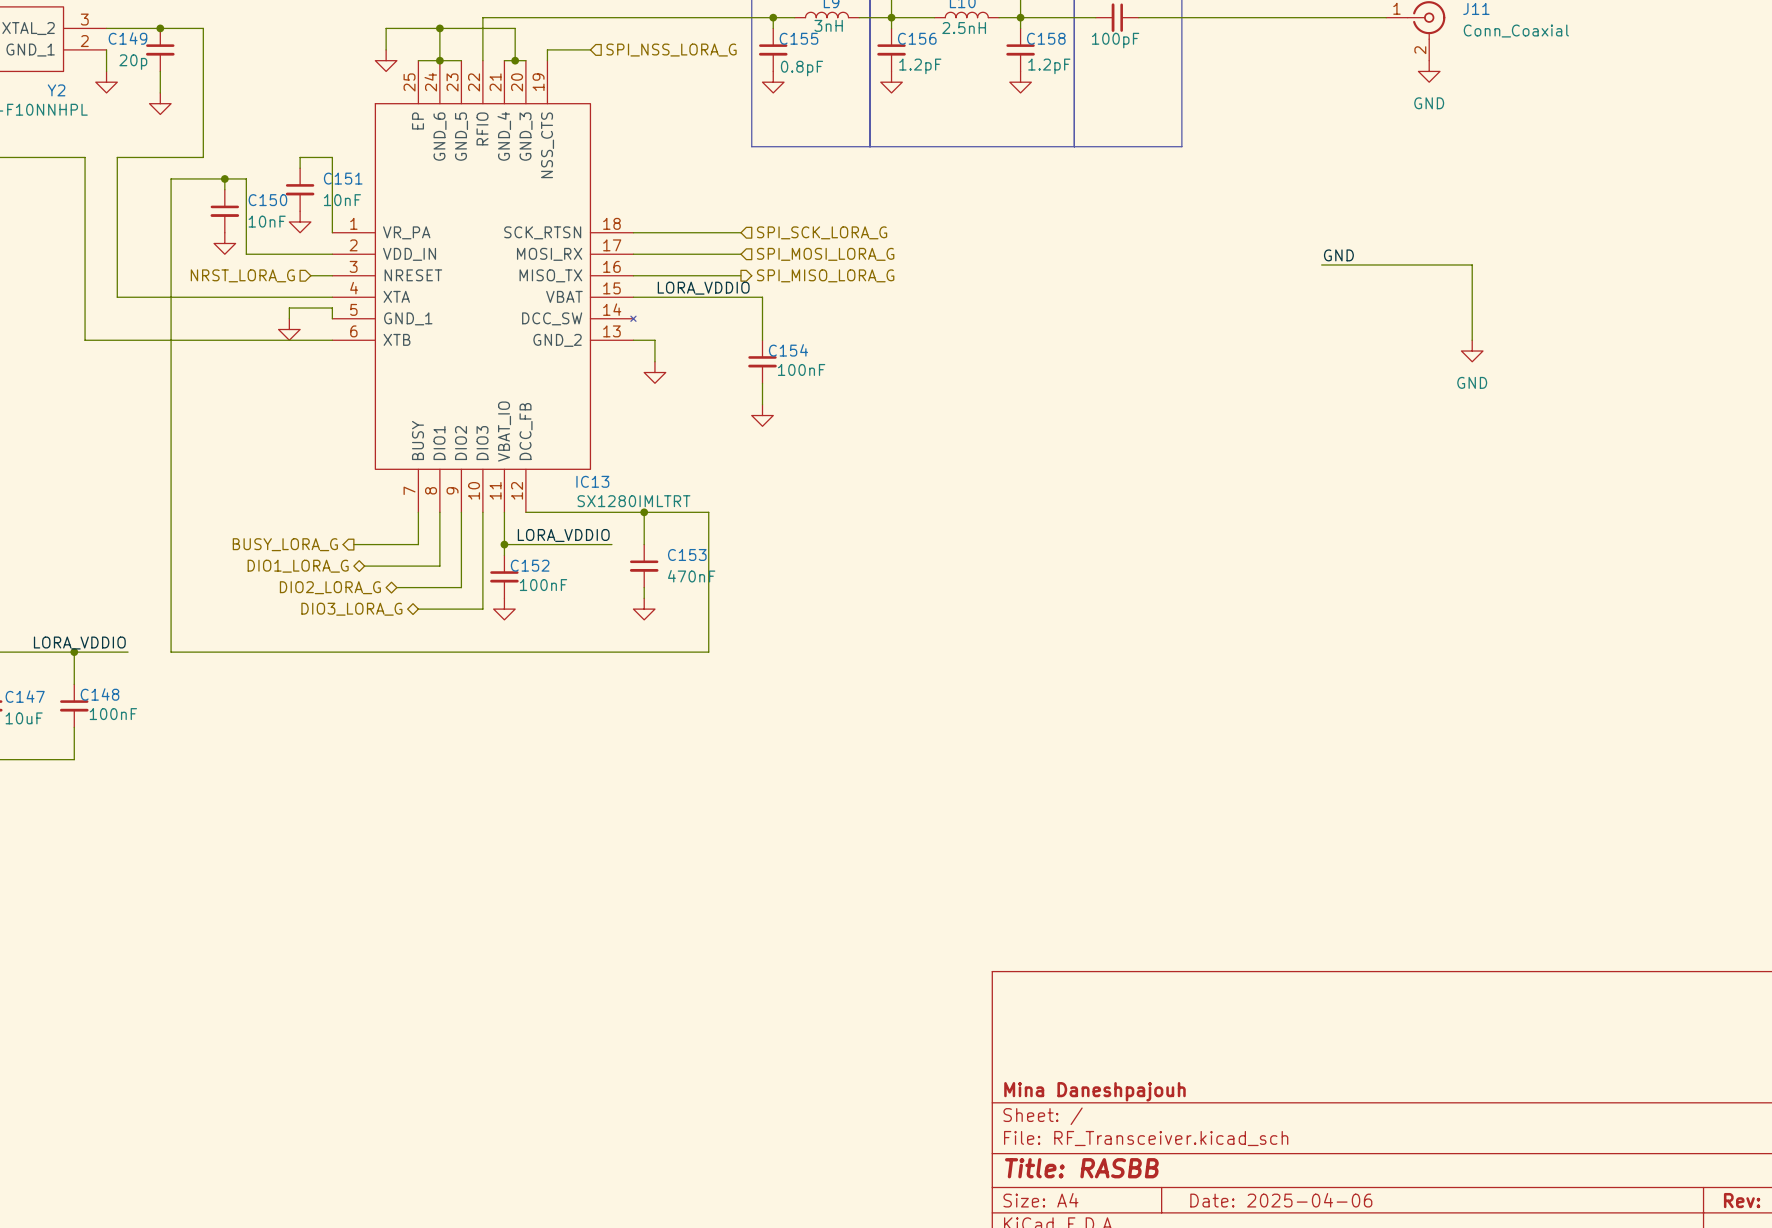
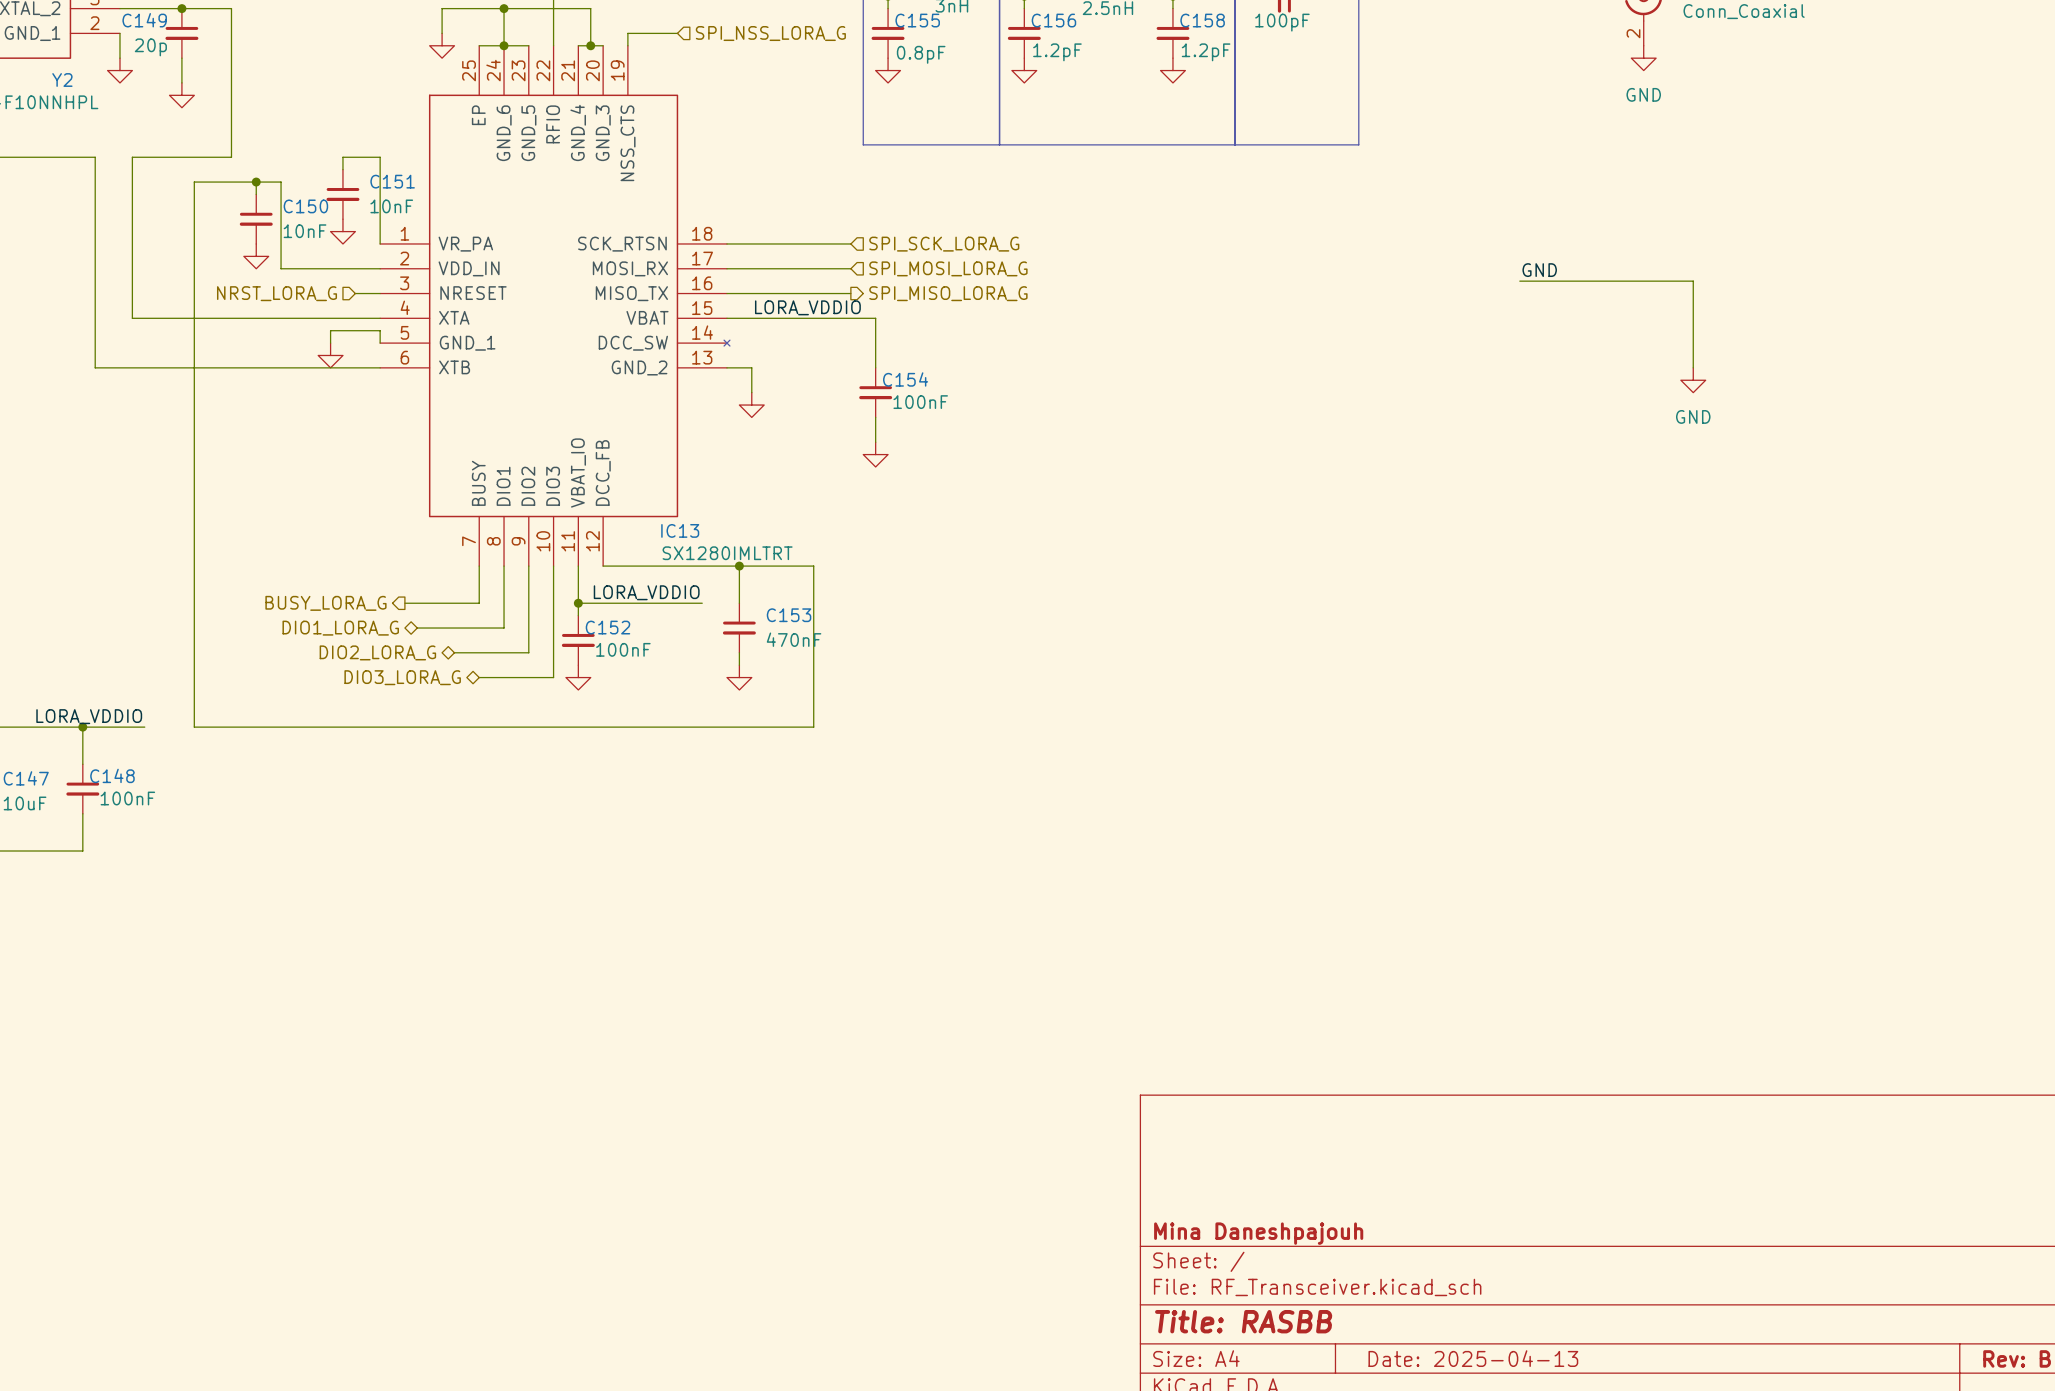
title block: Date: 2025-04-06 (1281, 1200) -> Date: 2025-04-13 (1473, 1358)

